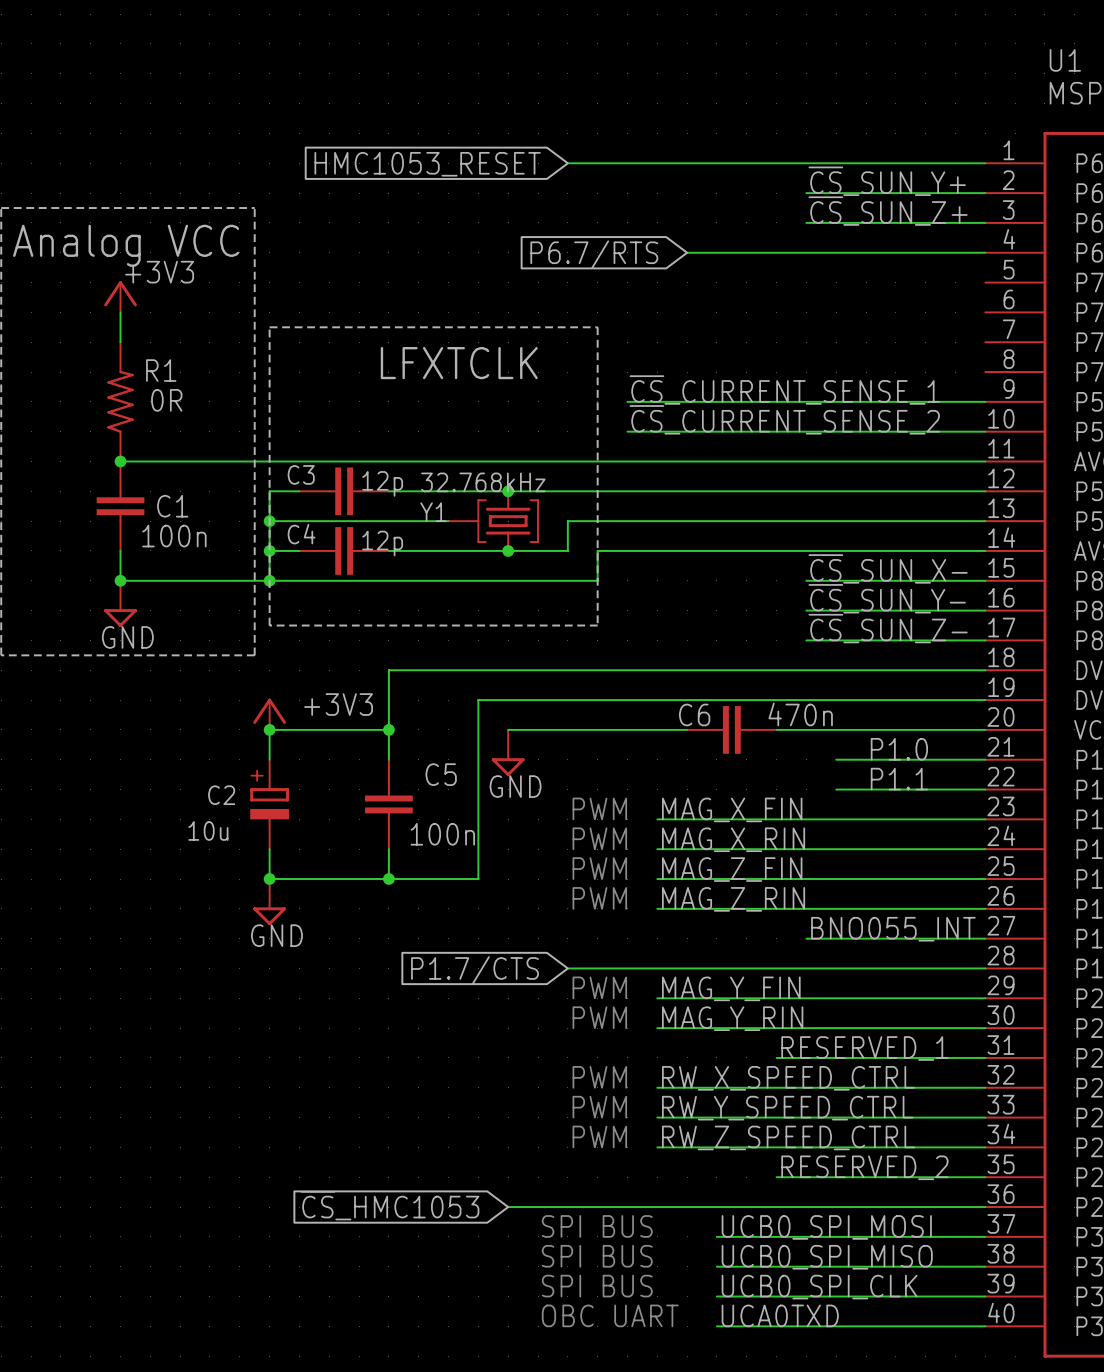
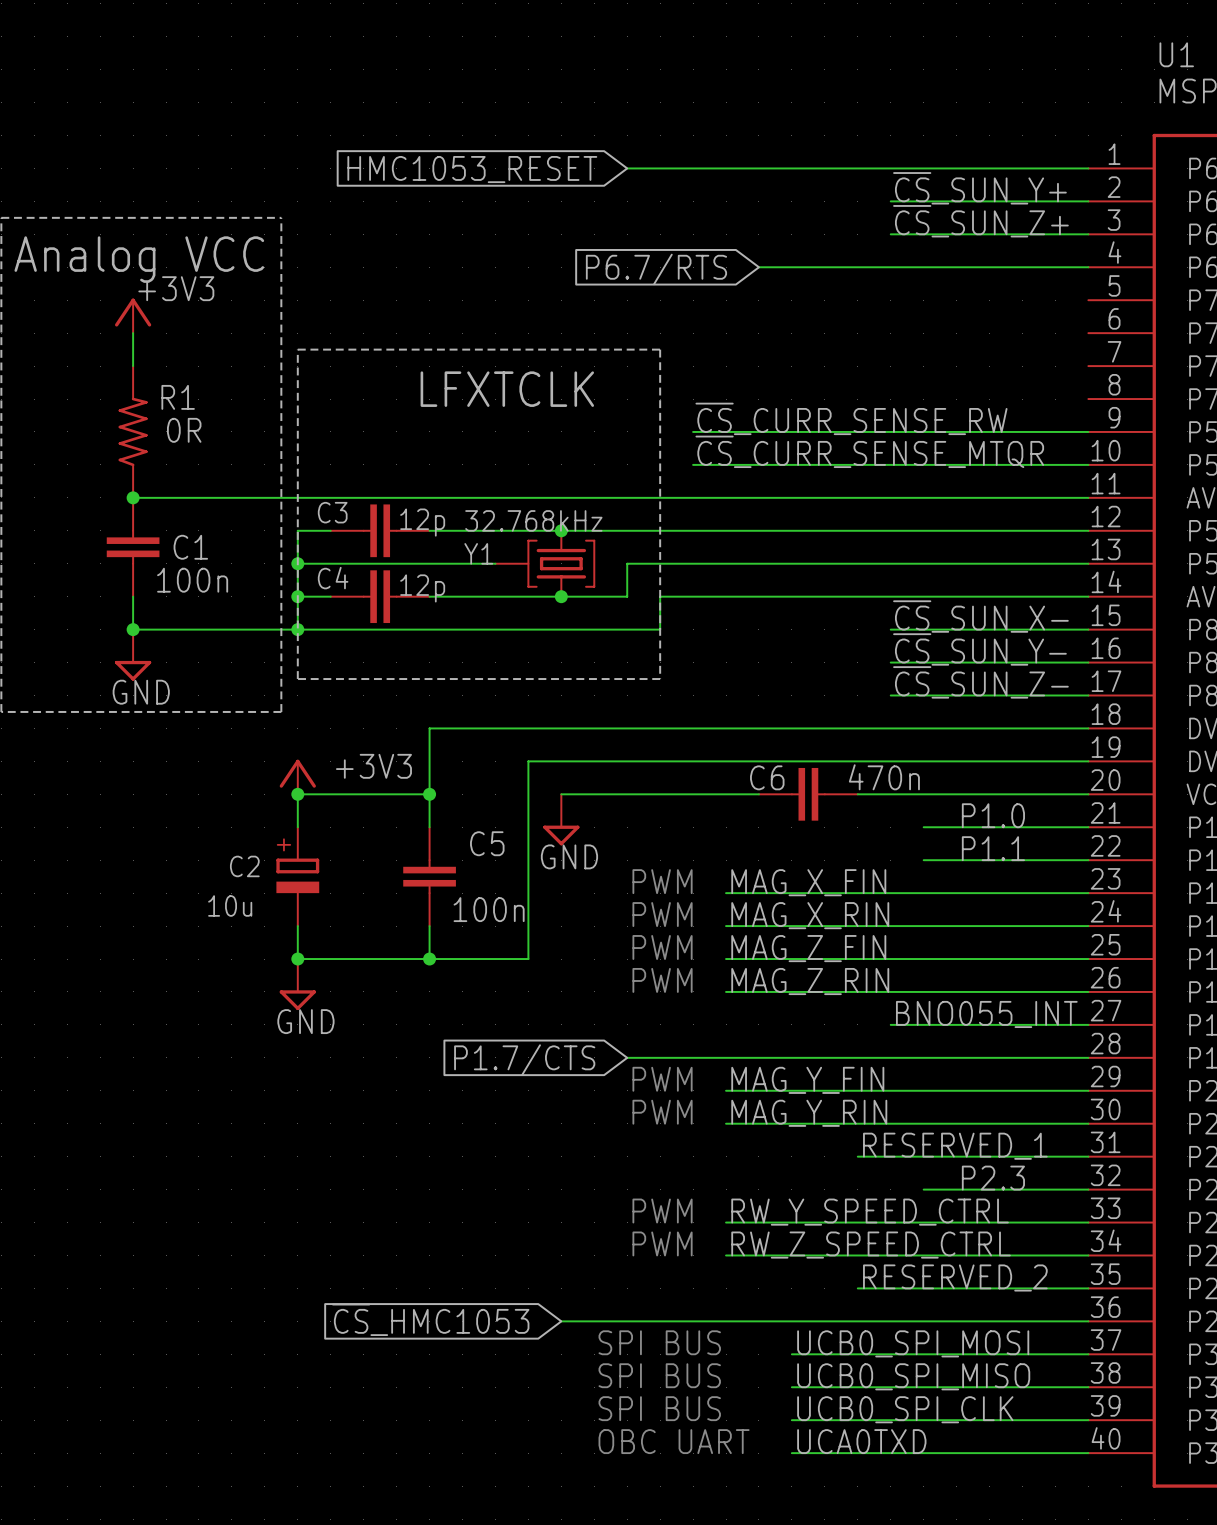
label: ~{CS}_CURRENT_SENSE_1 (784, 390) -> ~{CS}_CURR_SENSE_RW (851, 418)
label: ~{CS}_CURRENT_SENSE_2 (784, 419) -> ~{CS}_CURR_SENSE_MTQR (869, 451)
text: PWM (599, 1077) -> none
label: none -> P2.3 (993, 1178)
label: RW_X_SPEED_CTRL (788, 1078) -> none
wire: (657, 1087) (836, 1087) -> none

